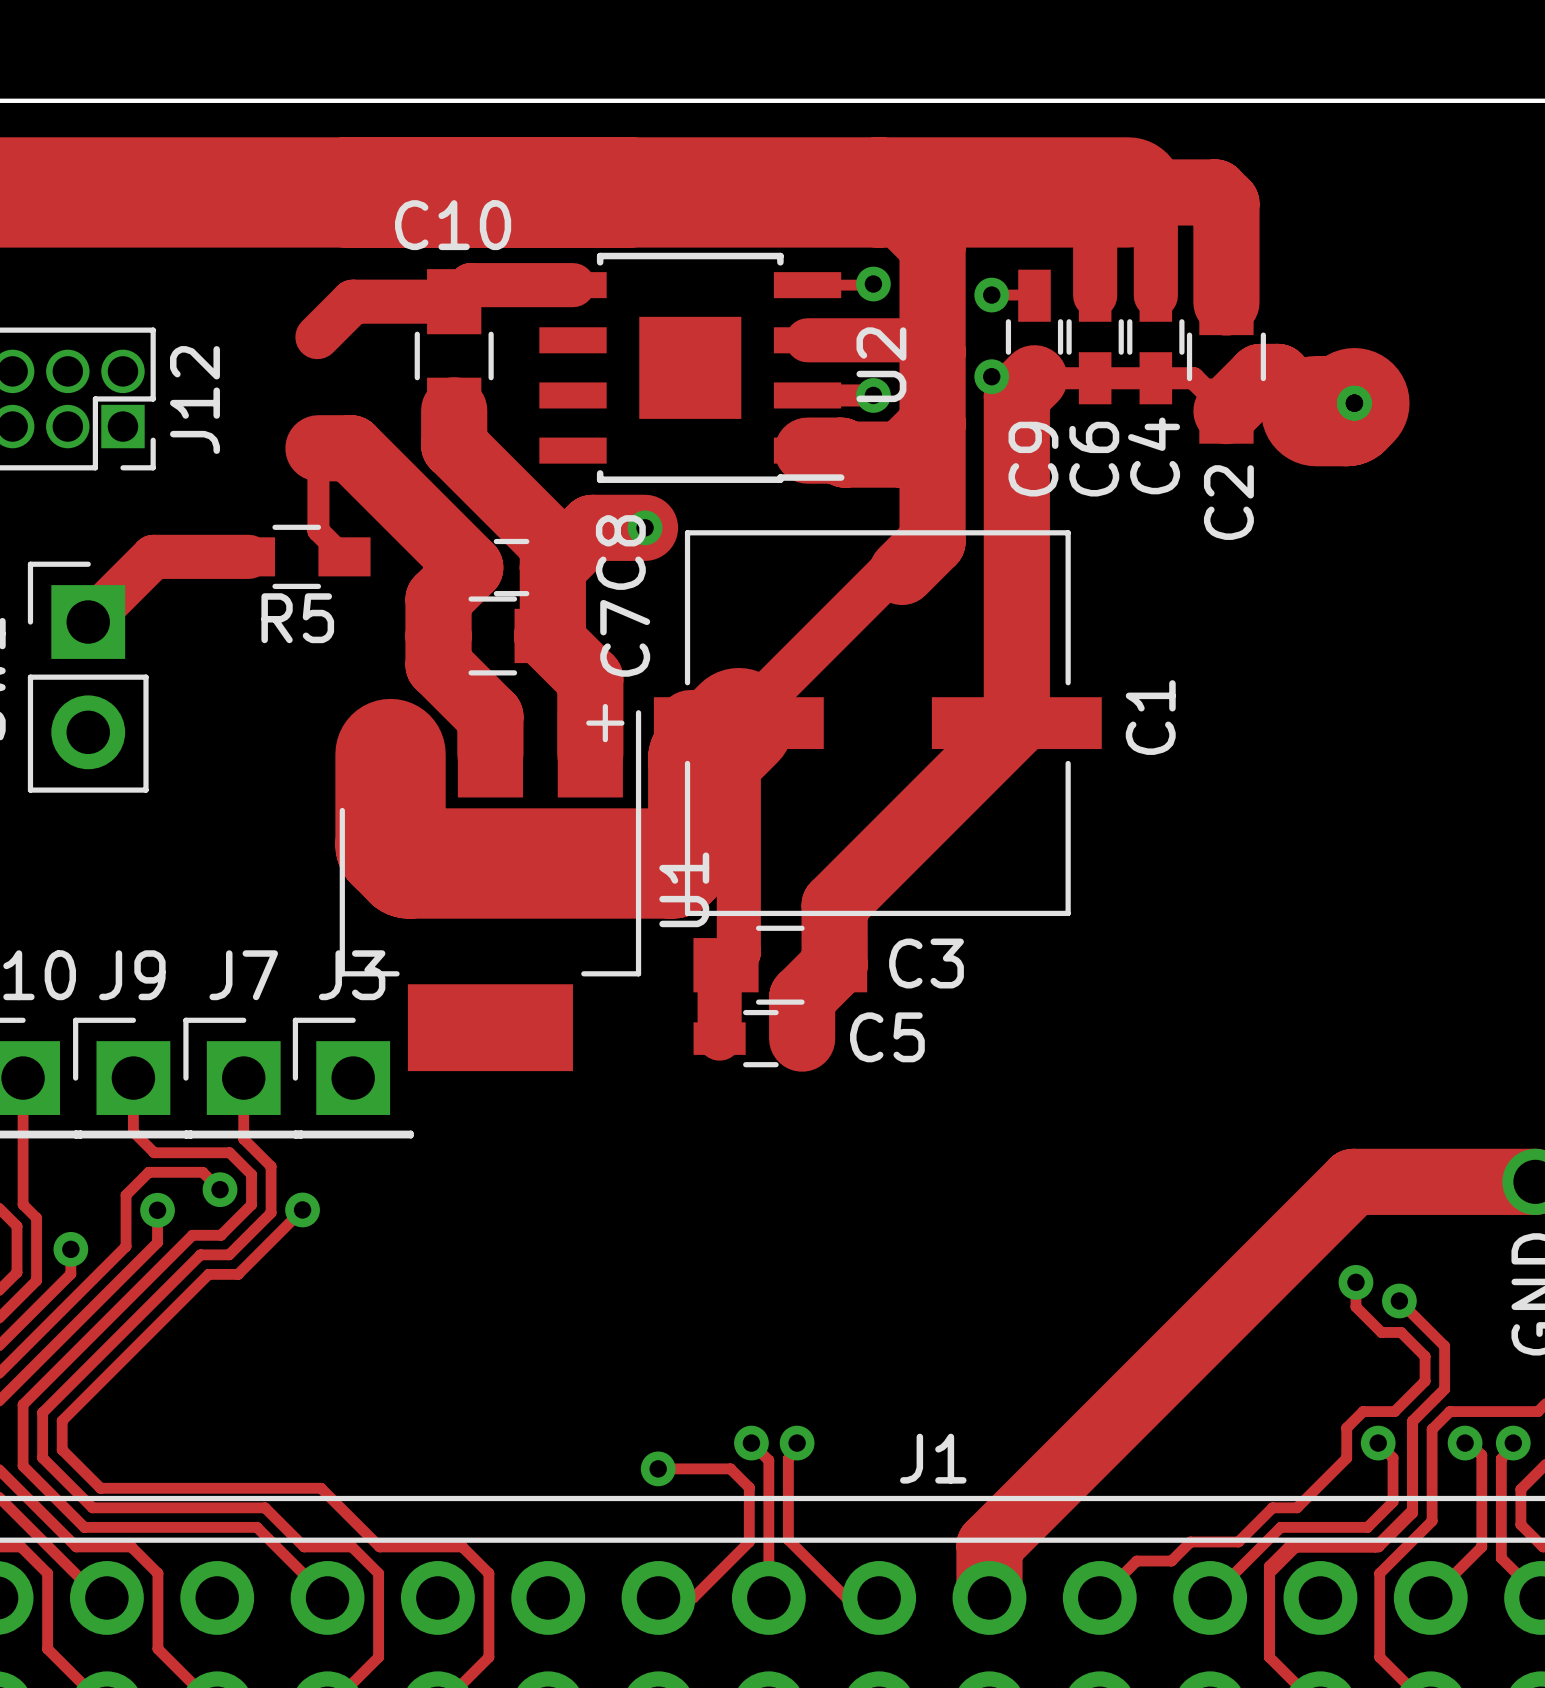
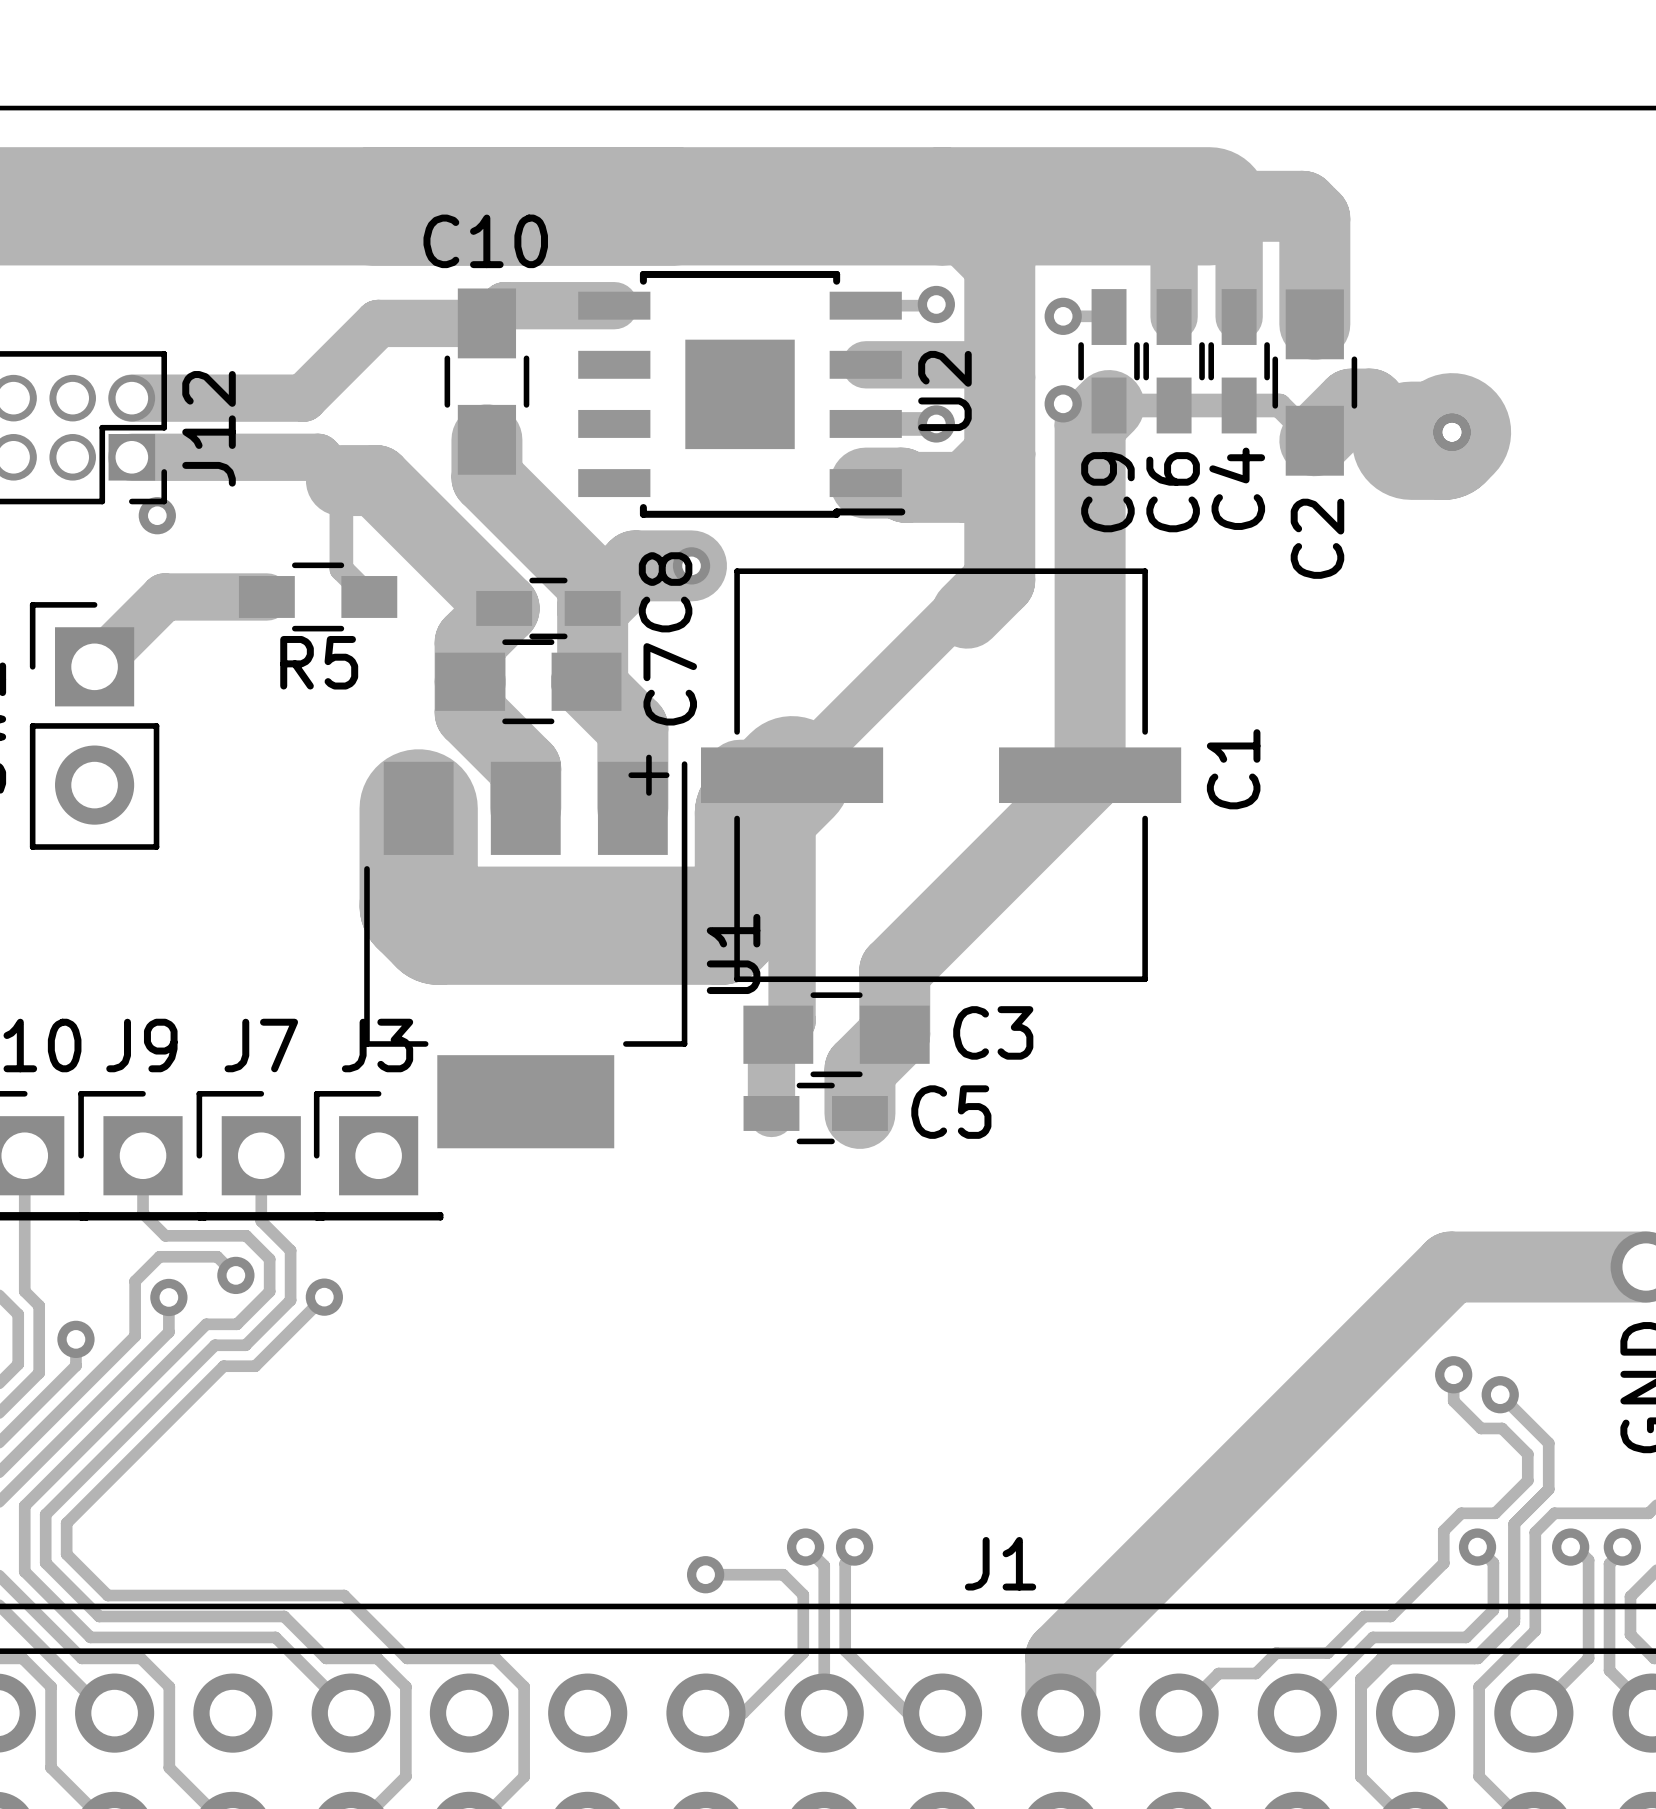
track: none -> (340, 361) (303, 398) (131, 398)
track: none -> (131, 457) (318, 457) (341, 480)
via: none -> (157, 515)

